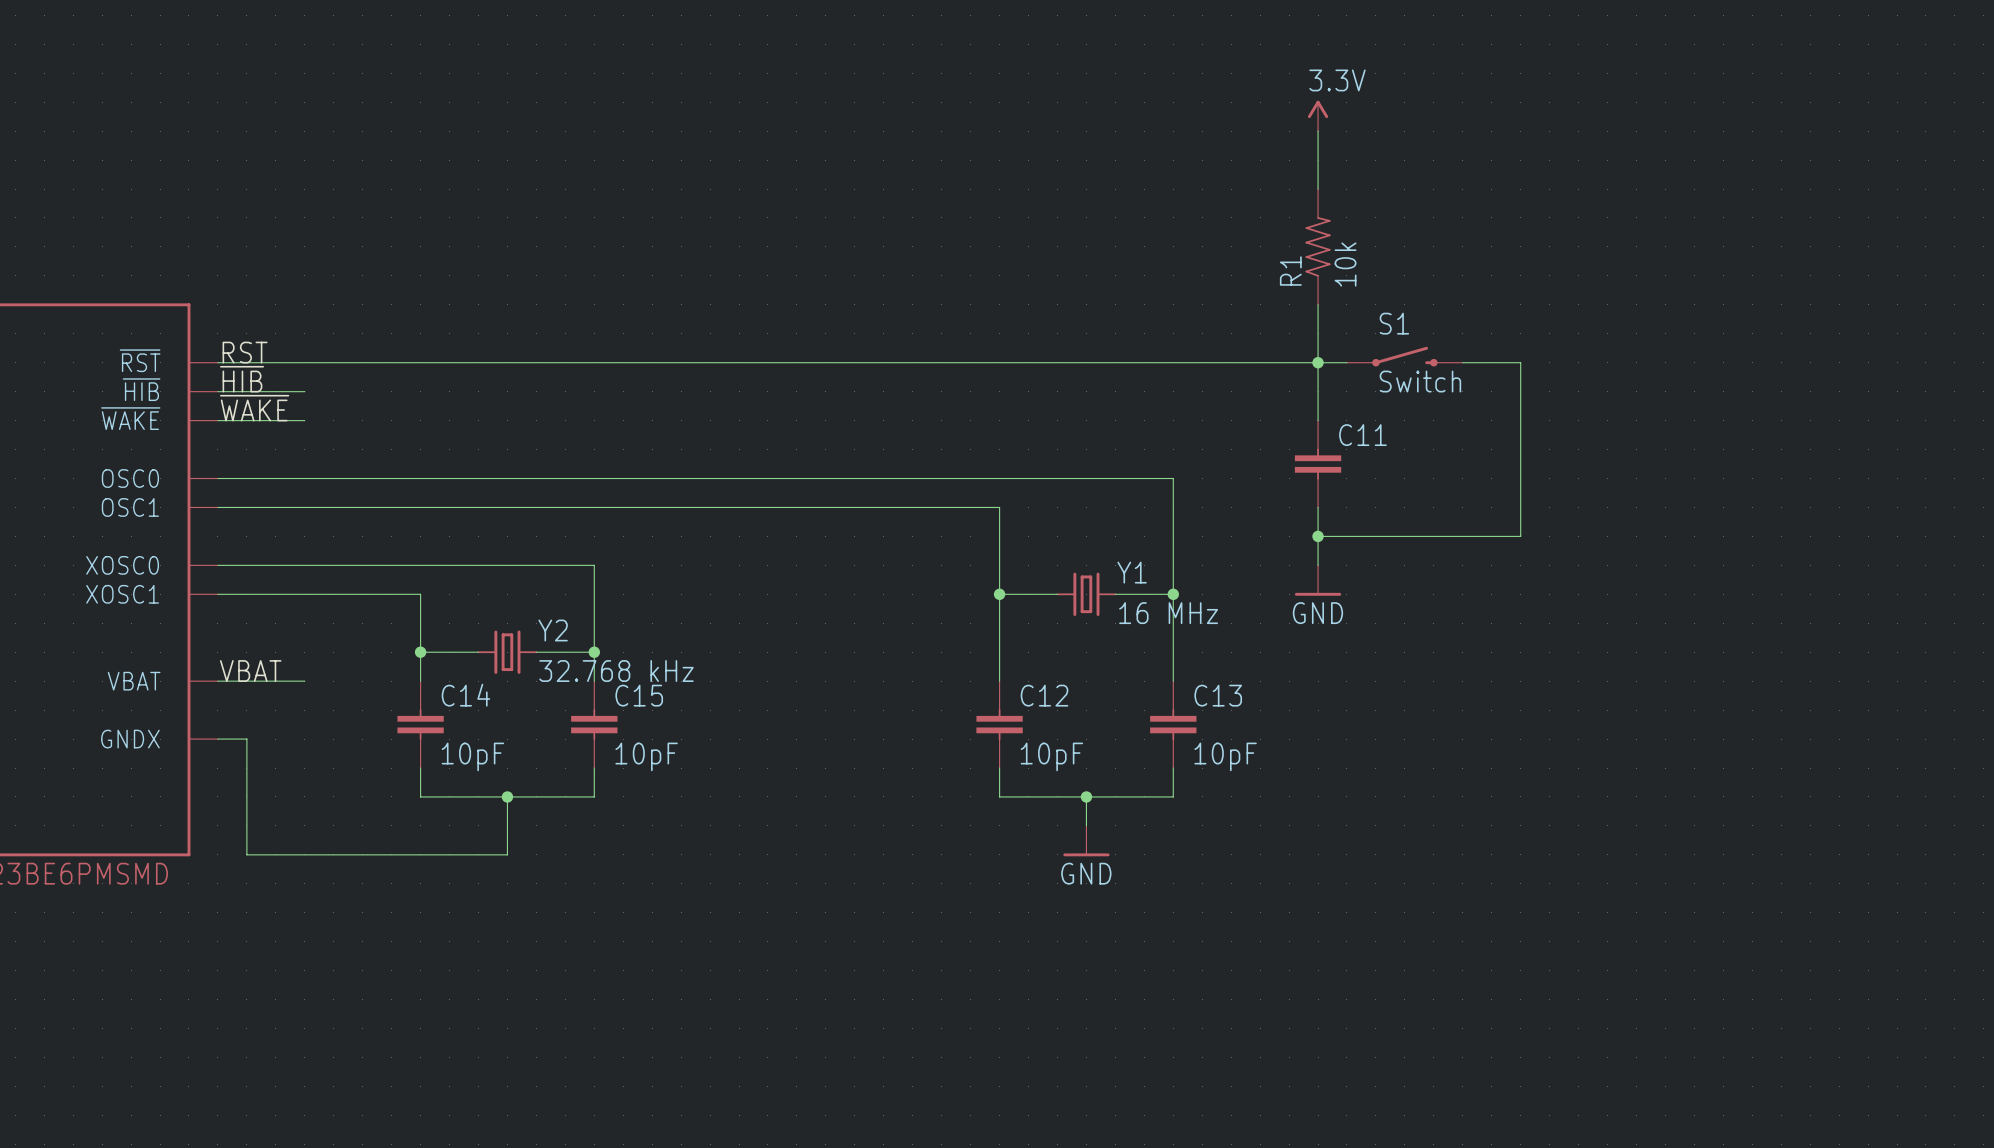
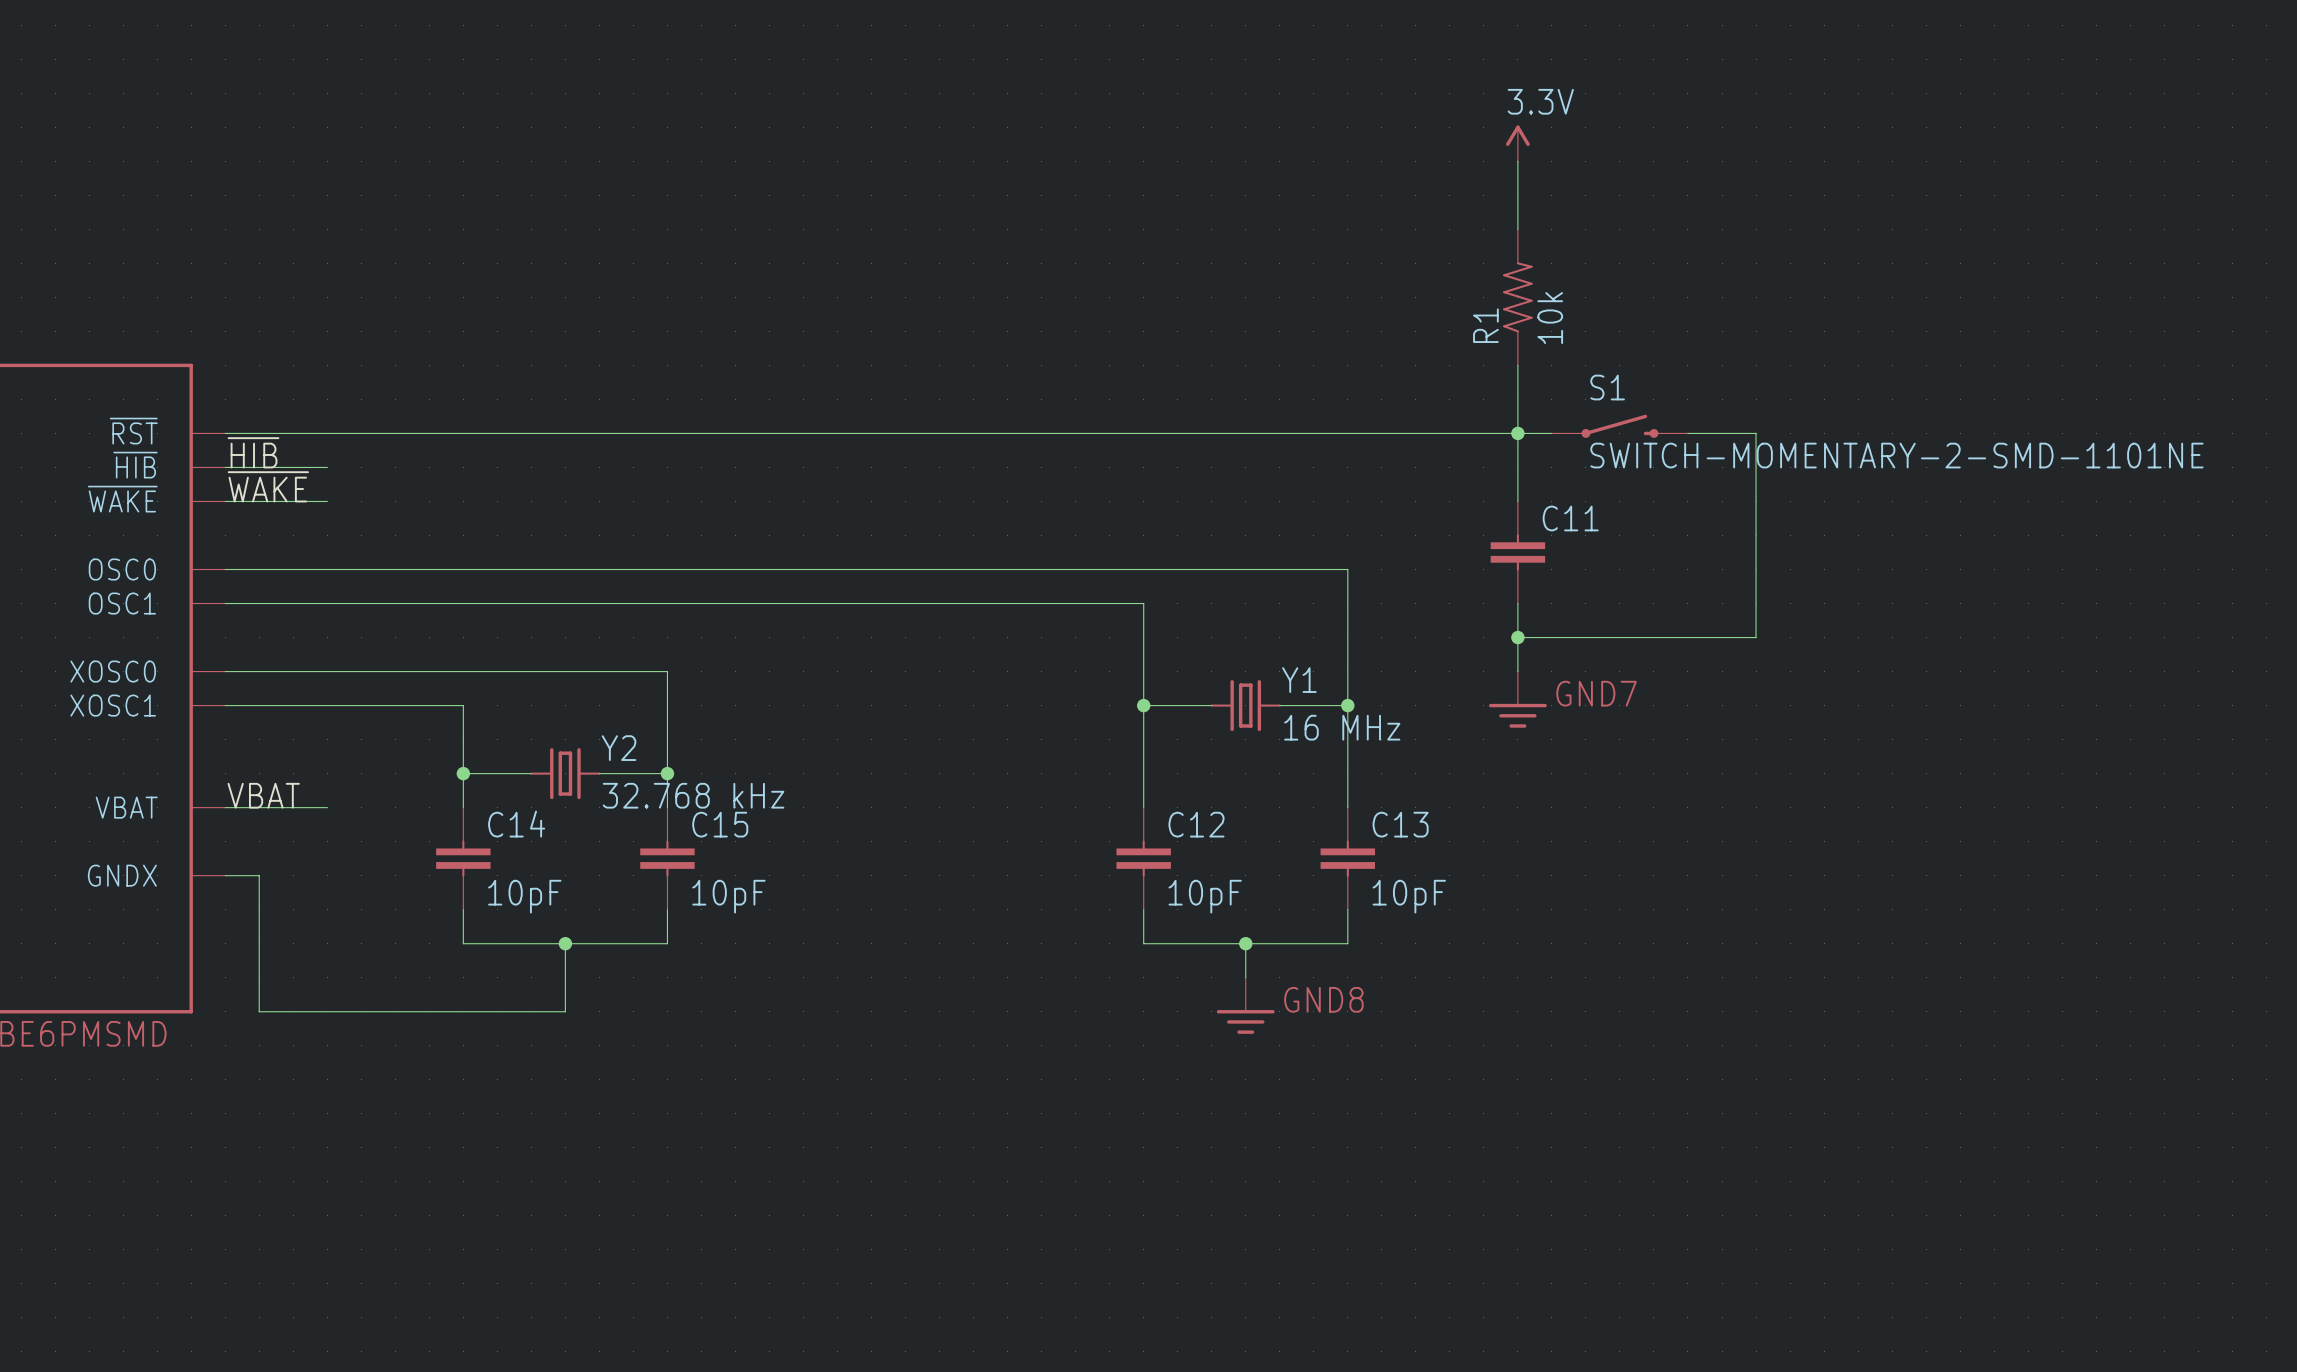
label: RST (245, 352) -> none
S1 value: Switch (1420, 381) -> SWITCH-MOMENTARY-2-SMD-1101NE (1896, 455)
GND7 shape: [1294, 565, 1342, 596] -> [1488, 671, 1547, 728]
GND7 name: none -> GND7 (1596, 693)
GND7 text: GND (1317, 613) -> none
GND8 shape: [1063, 825, 1110, 857] -> [1216, 977, 1275, 1034]
GND8 name: none -> GND8 (1323, 999)
GND8 text: GND (1086, 873) -> none

